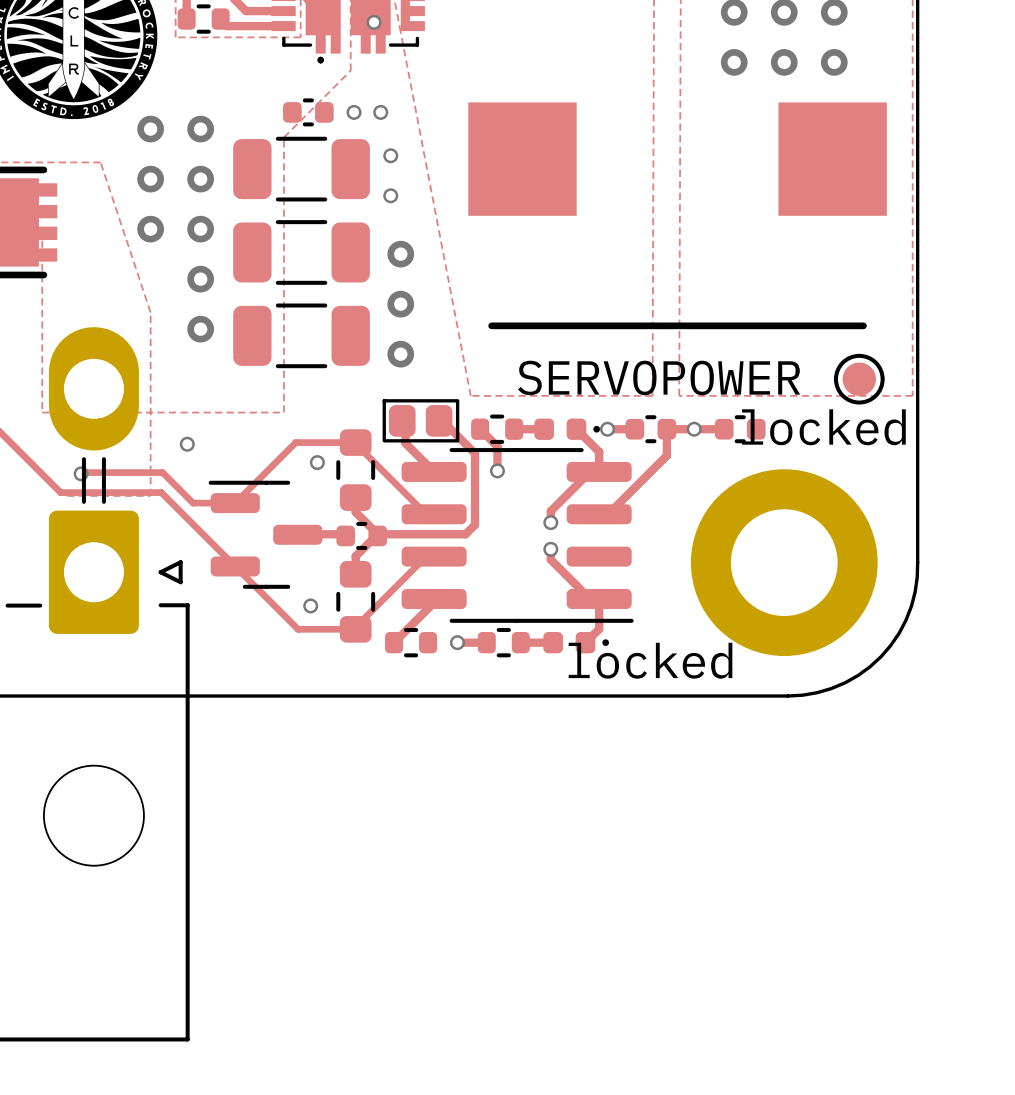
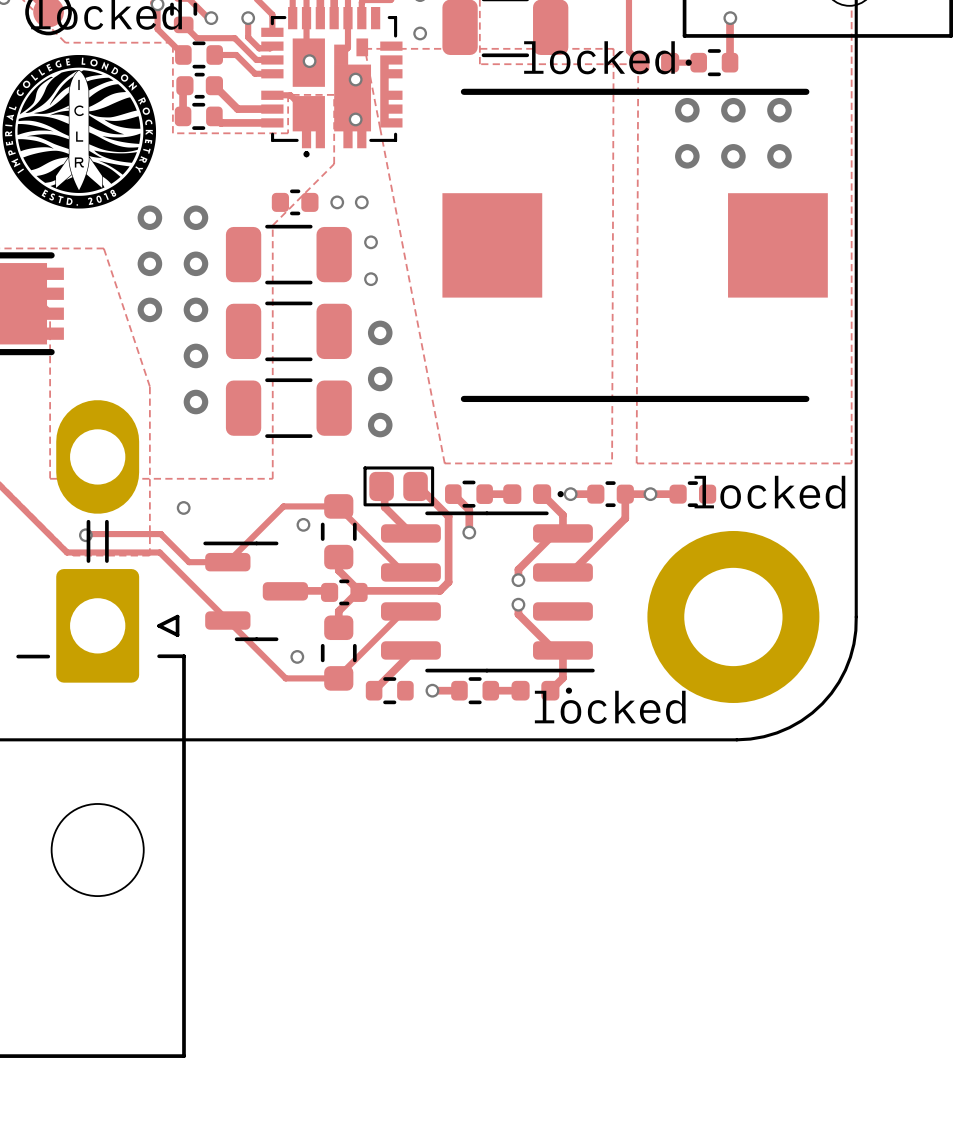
SERVOPOWER: (859, 379) -> none

